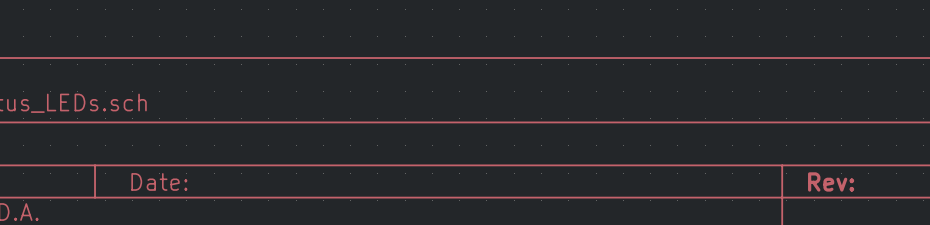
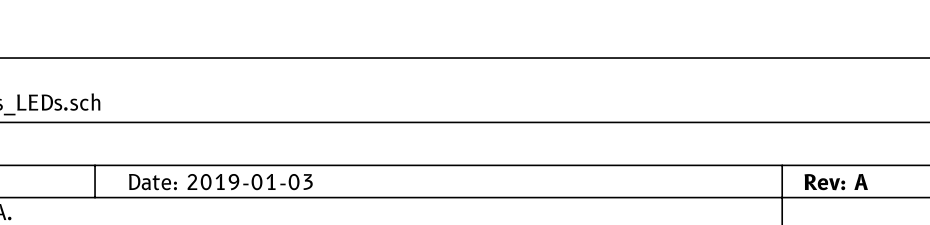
title block: Date: (159, 181) -> Date: 2019-01-03 (220, 182)
title block: Rev: (831, 181) -> Rev: A (836, 182)

